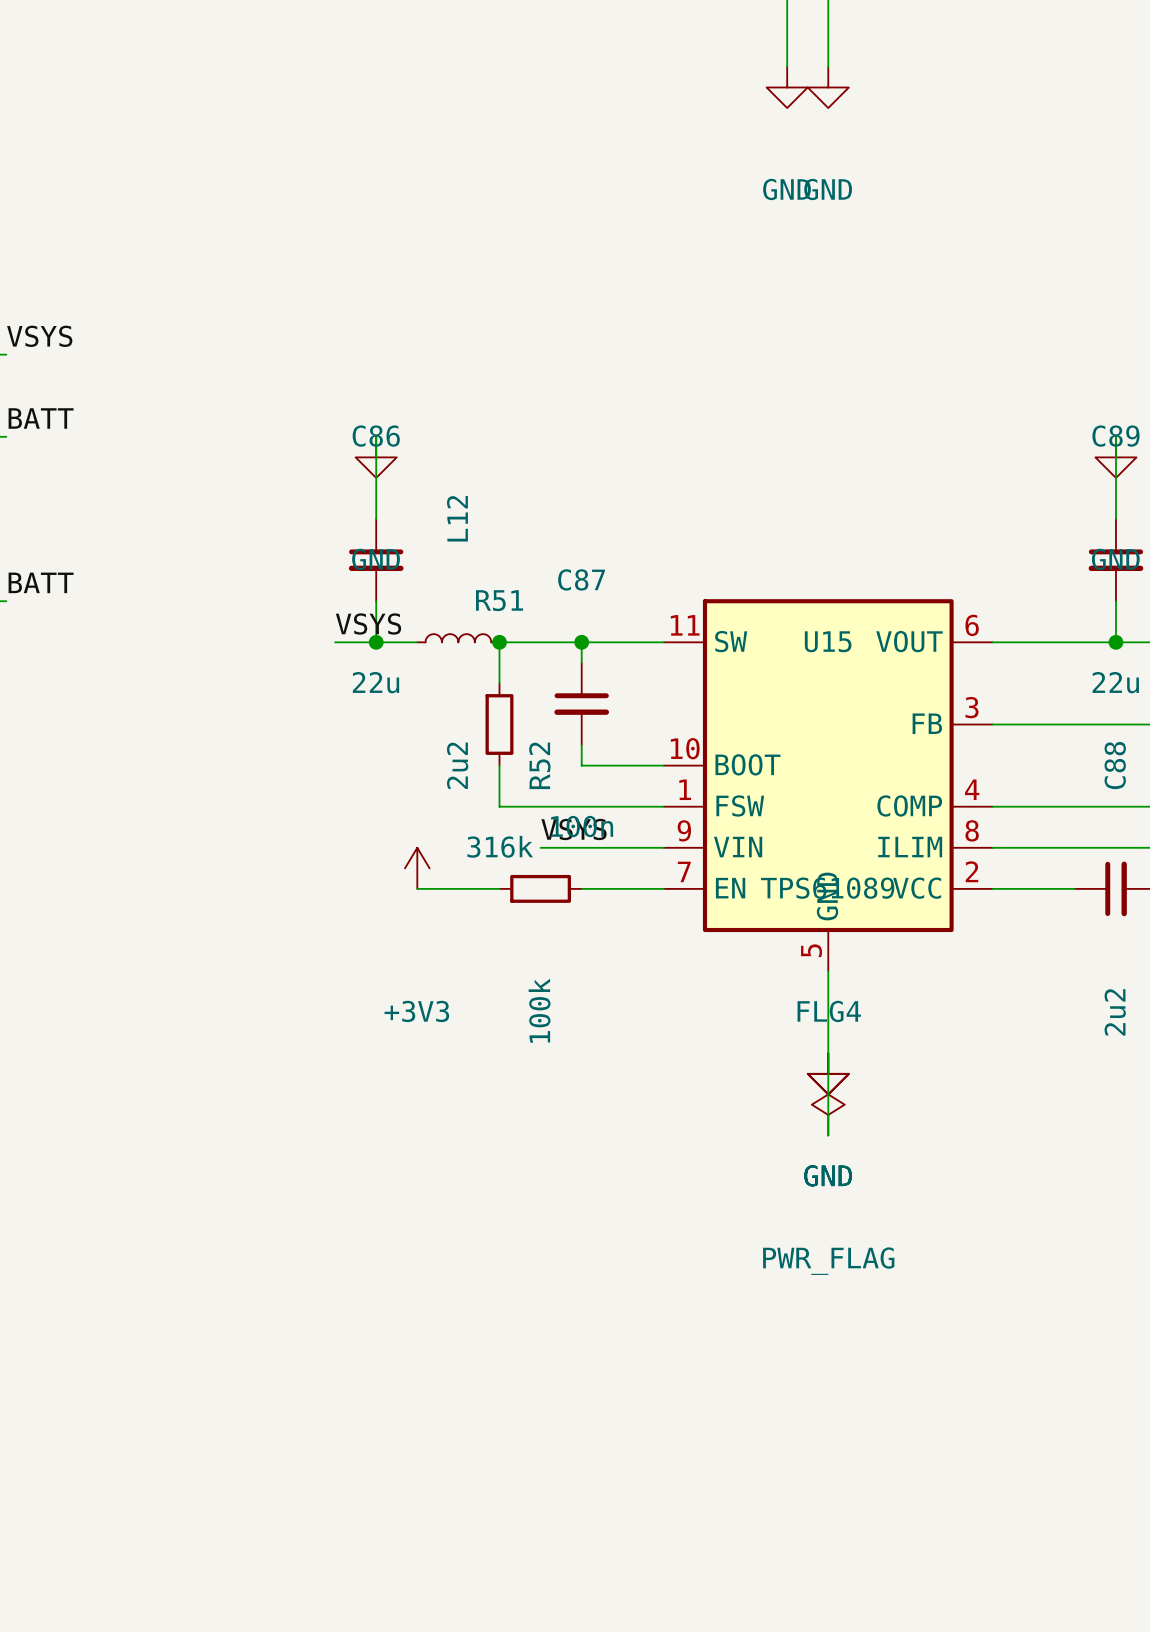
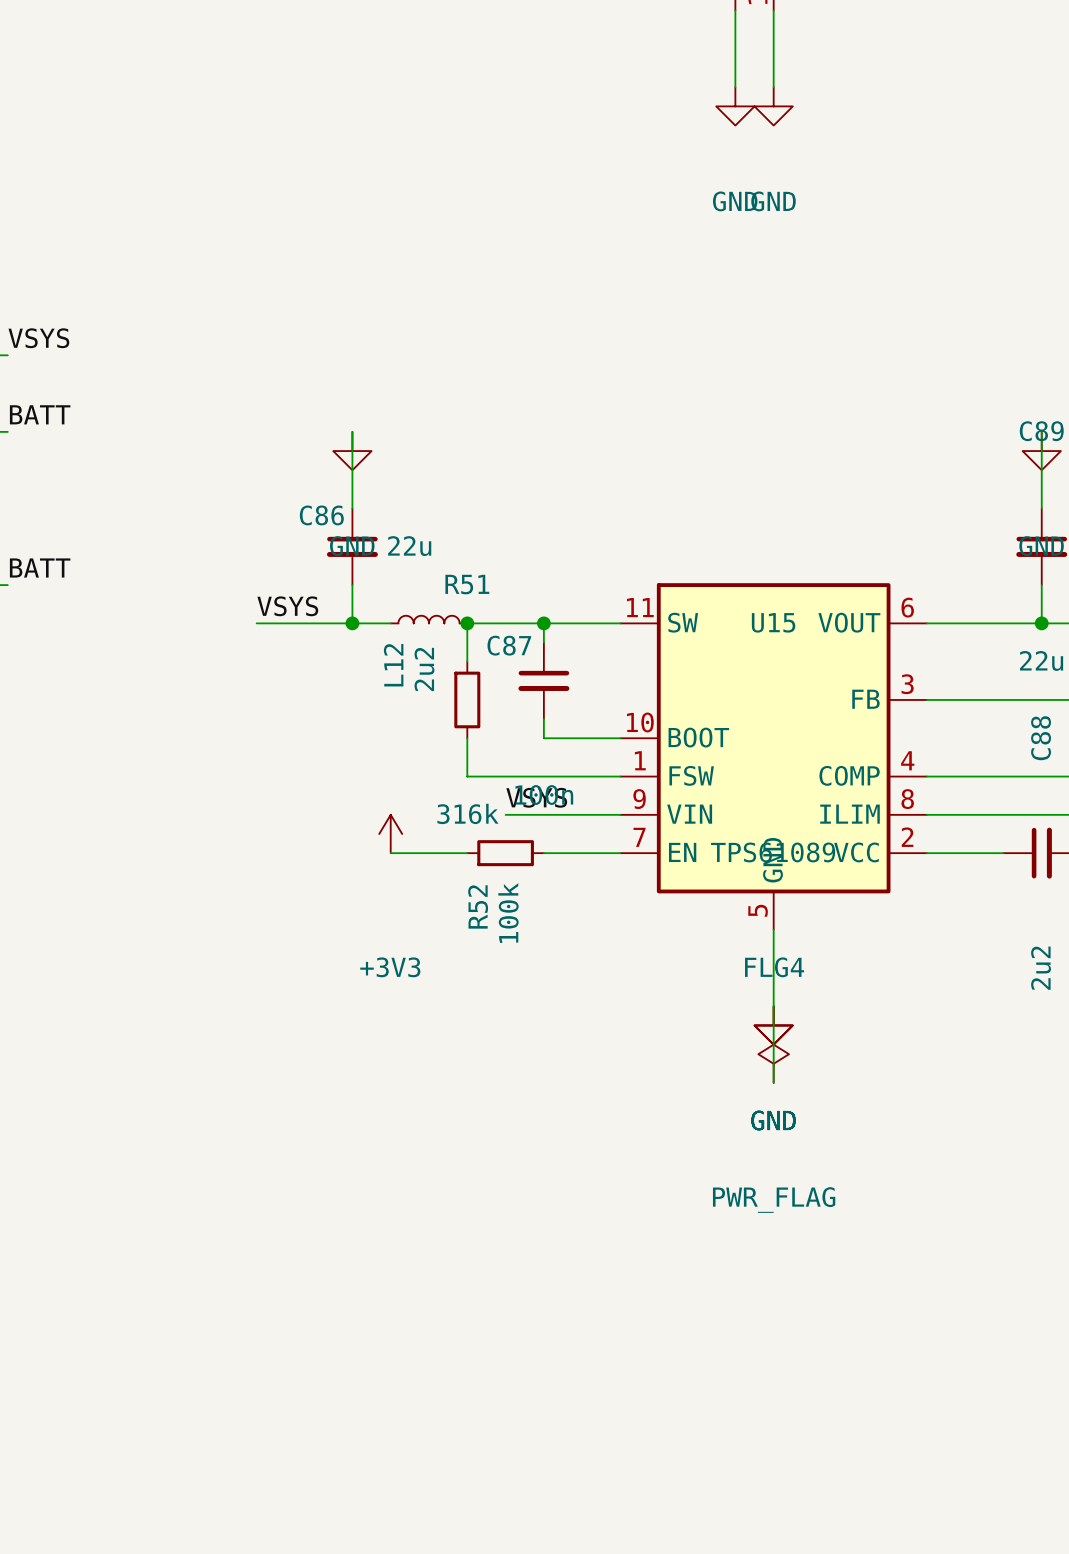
C86 name position: C86 (376, 436) -> C86 (321, 515)
L12 name position: L12 (457, 518) -> L12 (393, 665)
C87 name position: C87 (581, 579) -> C87 (509, 645)
label position: VSYS (368, 624) -> VSYS (287, 606)
wire: none -> (256, 623) (314, 623)
C86 value position: 22u (375, 682) -> 22u (409, 546)
L12 value position: 2u2 (457, 765) -> 2u2 (424, 669)
R52 name position: R52 (539, 765) -> R52 (478, 906)
R52 value position: 100k (539, 1010) -> 100k (508, 913)

